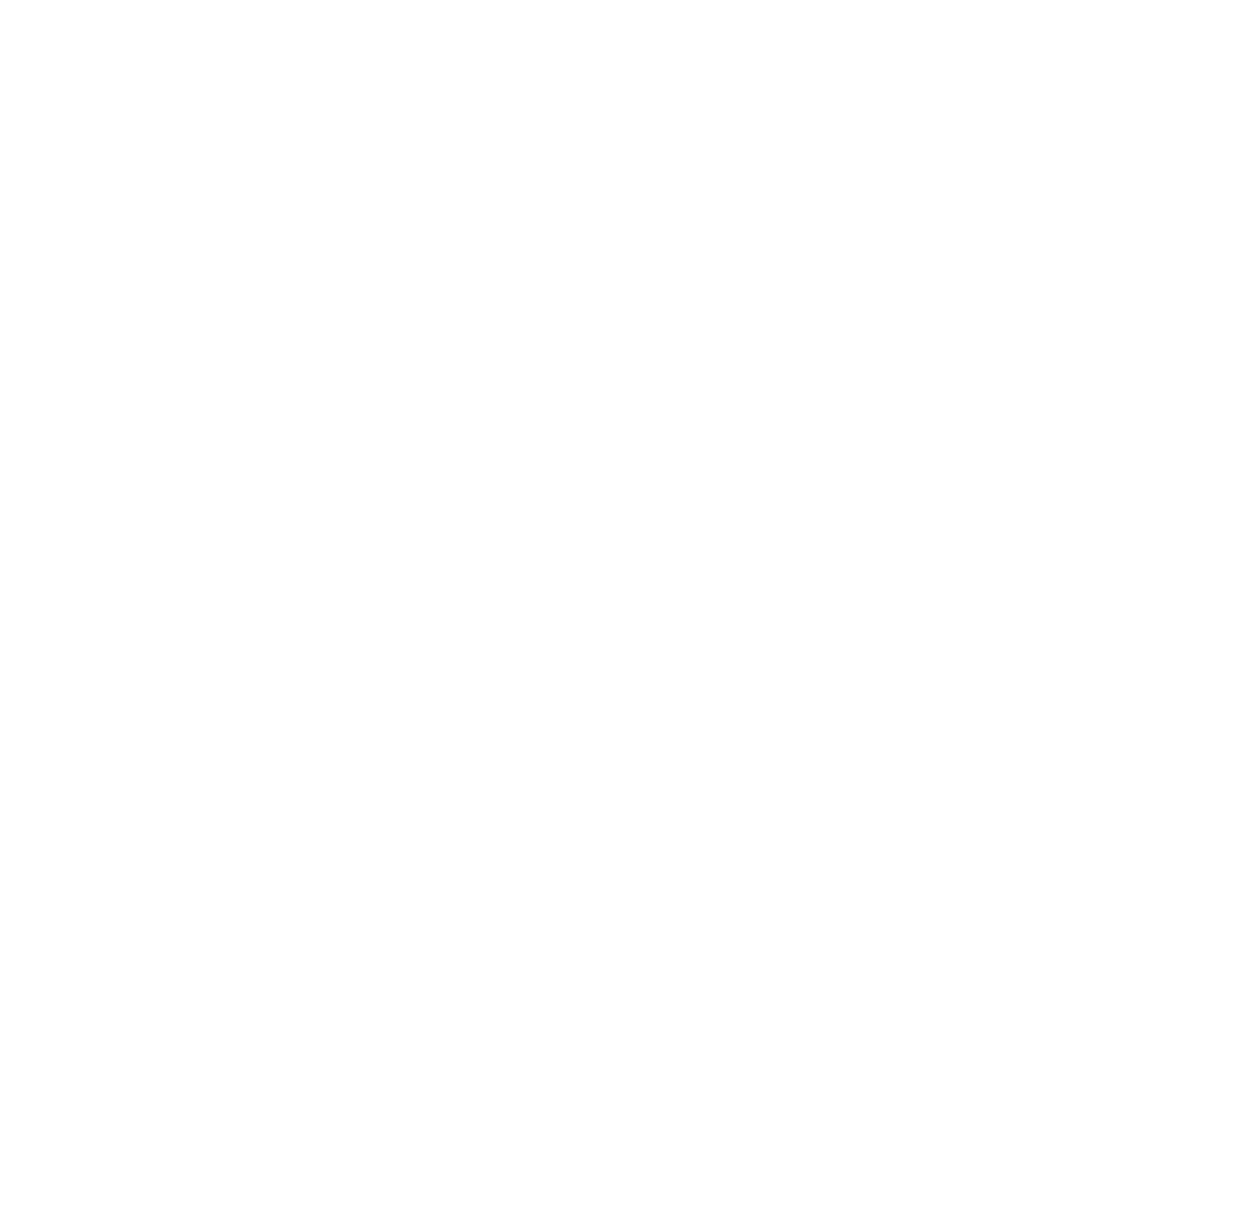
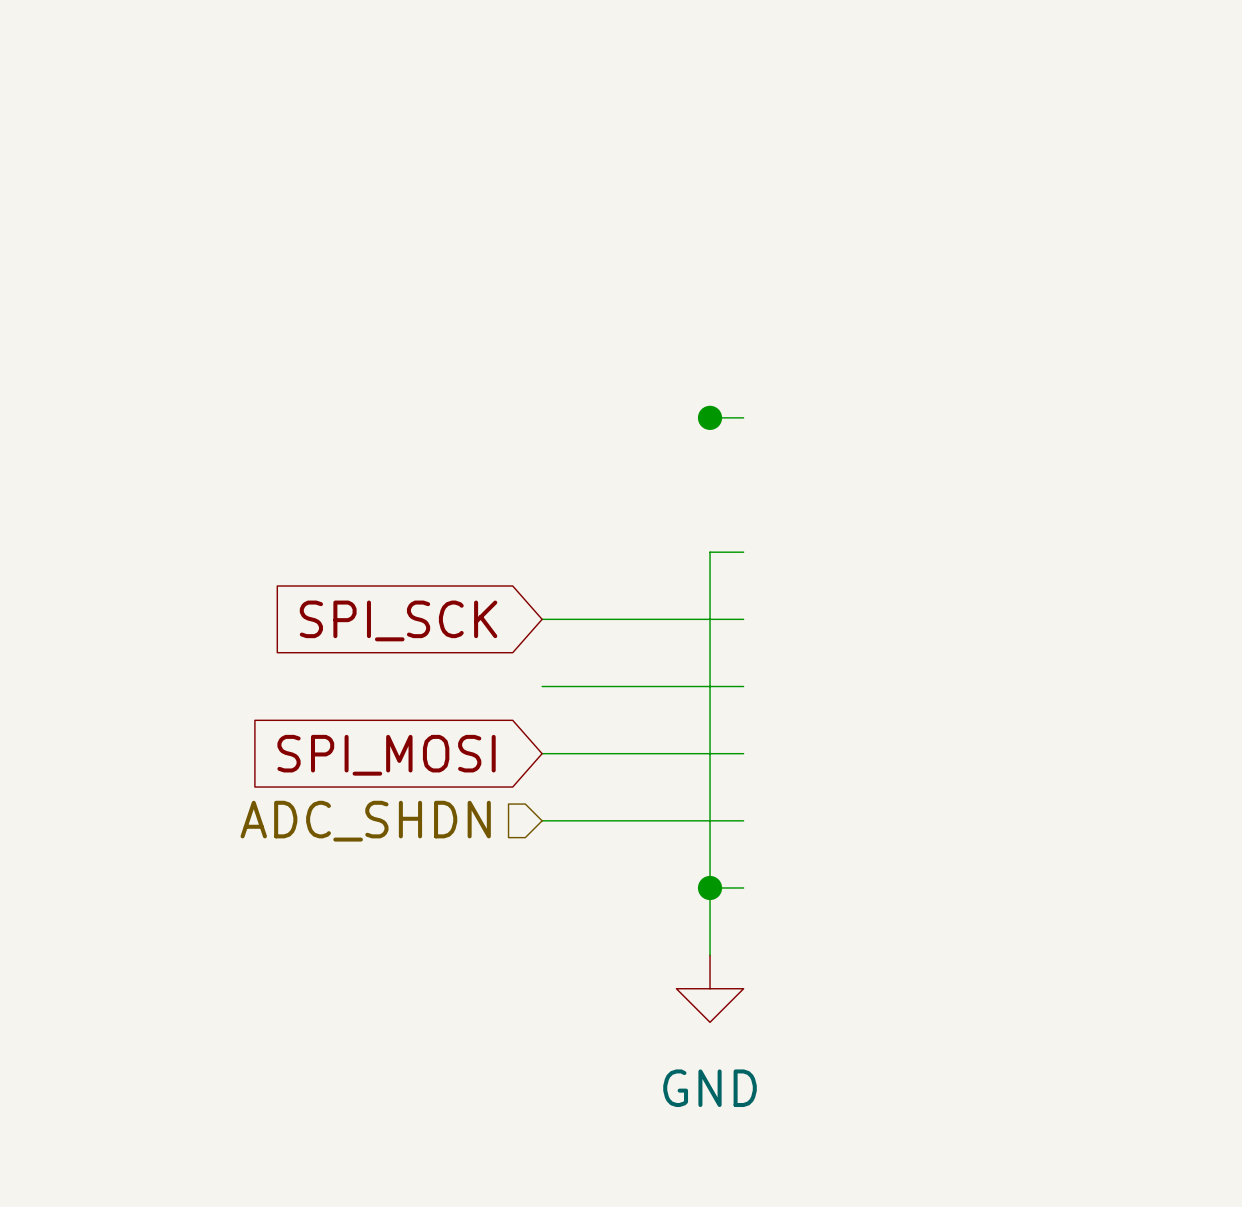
wire: none -> (710, 417) (743, 417)
junction: none -> (710, 417)
wire: none -> (743, 552) (710, 552) (710, 955)
global label: none -> SPI_SCK (398, 620)
wire: none -> (542, 619) (743, 619)
wire: none -> (542, 686) (743, 686)
global label: none -> SPI_MOSI (386, 755)
wire: none -> (542, 753) (743, 753)
hierarchical label: none -> ADC_SHDN (365, 821)
wire: none -> (542, 820) (743, 820)
wire: none -> (710, 887) (743, 887)
junction: none -> (710, 887)
power symbol: none -> GND (710, 988)

